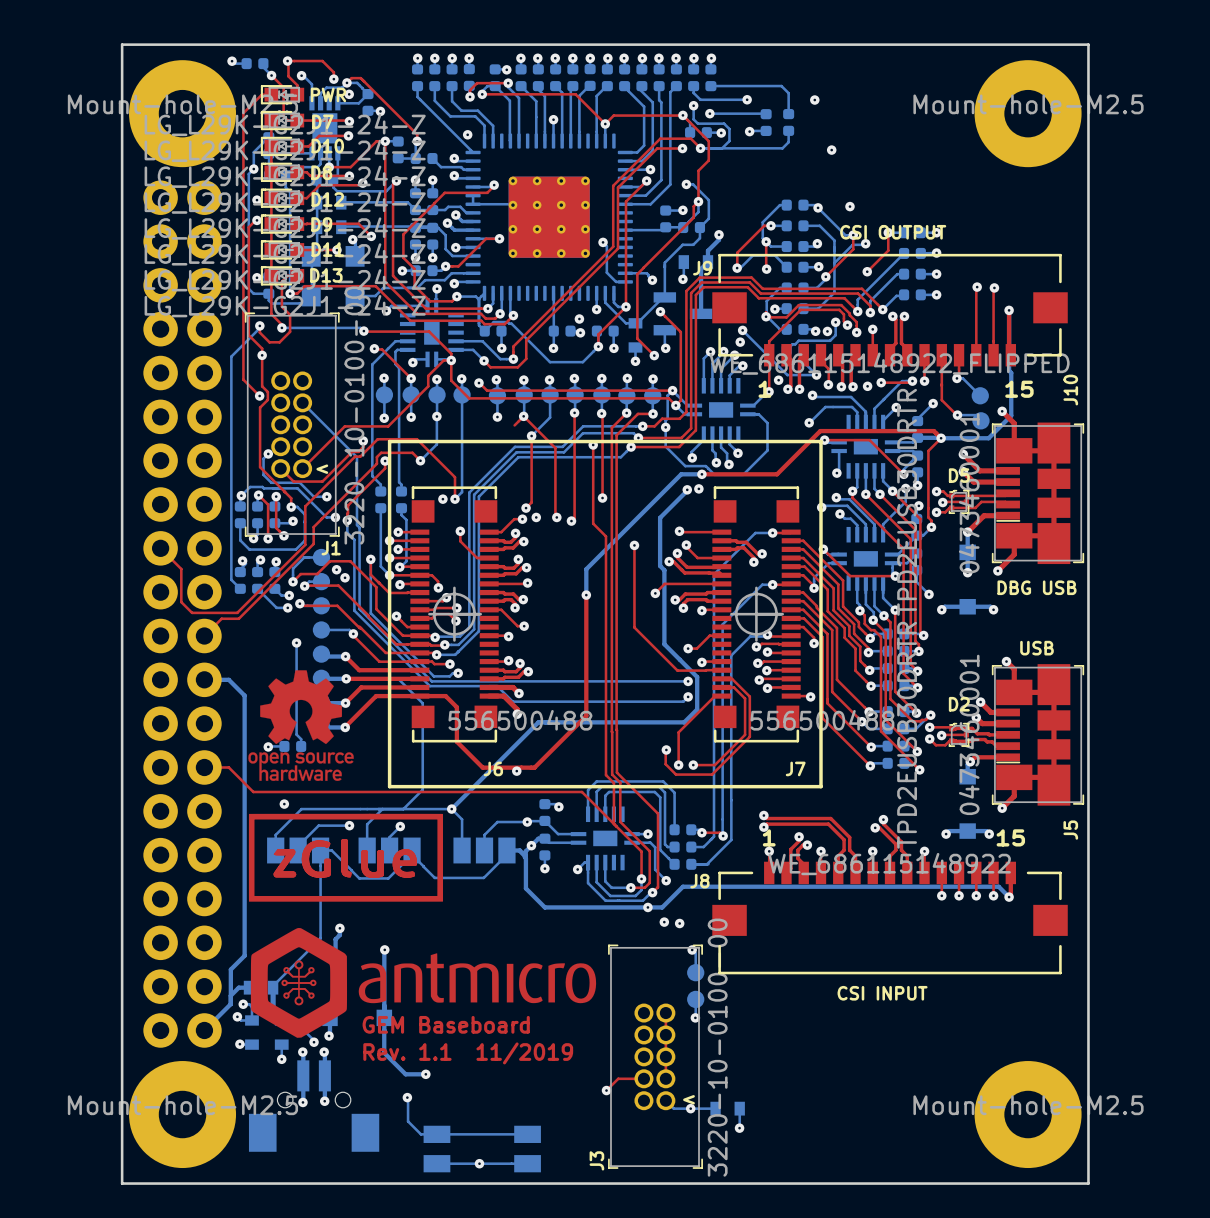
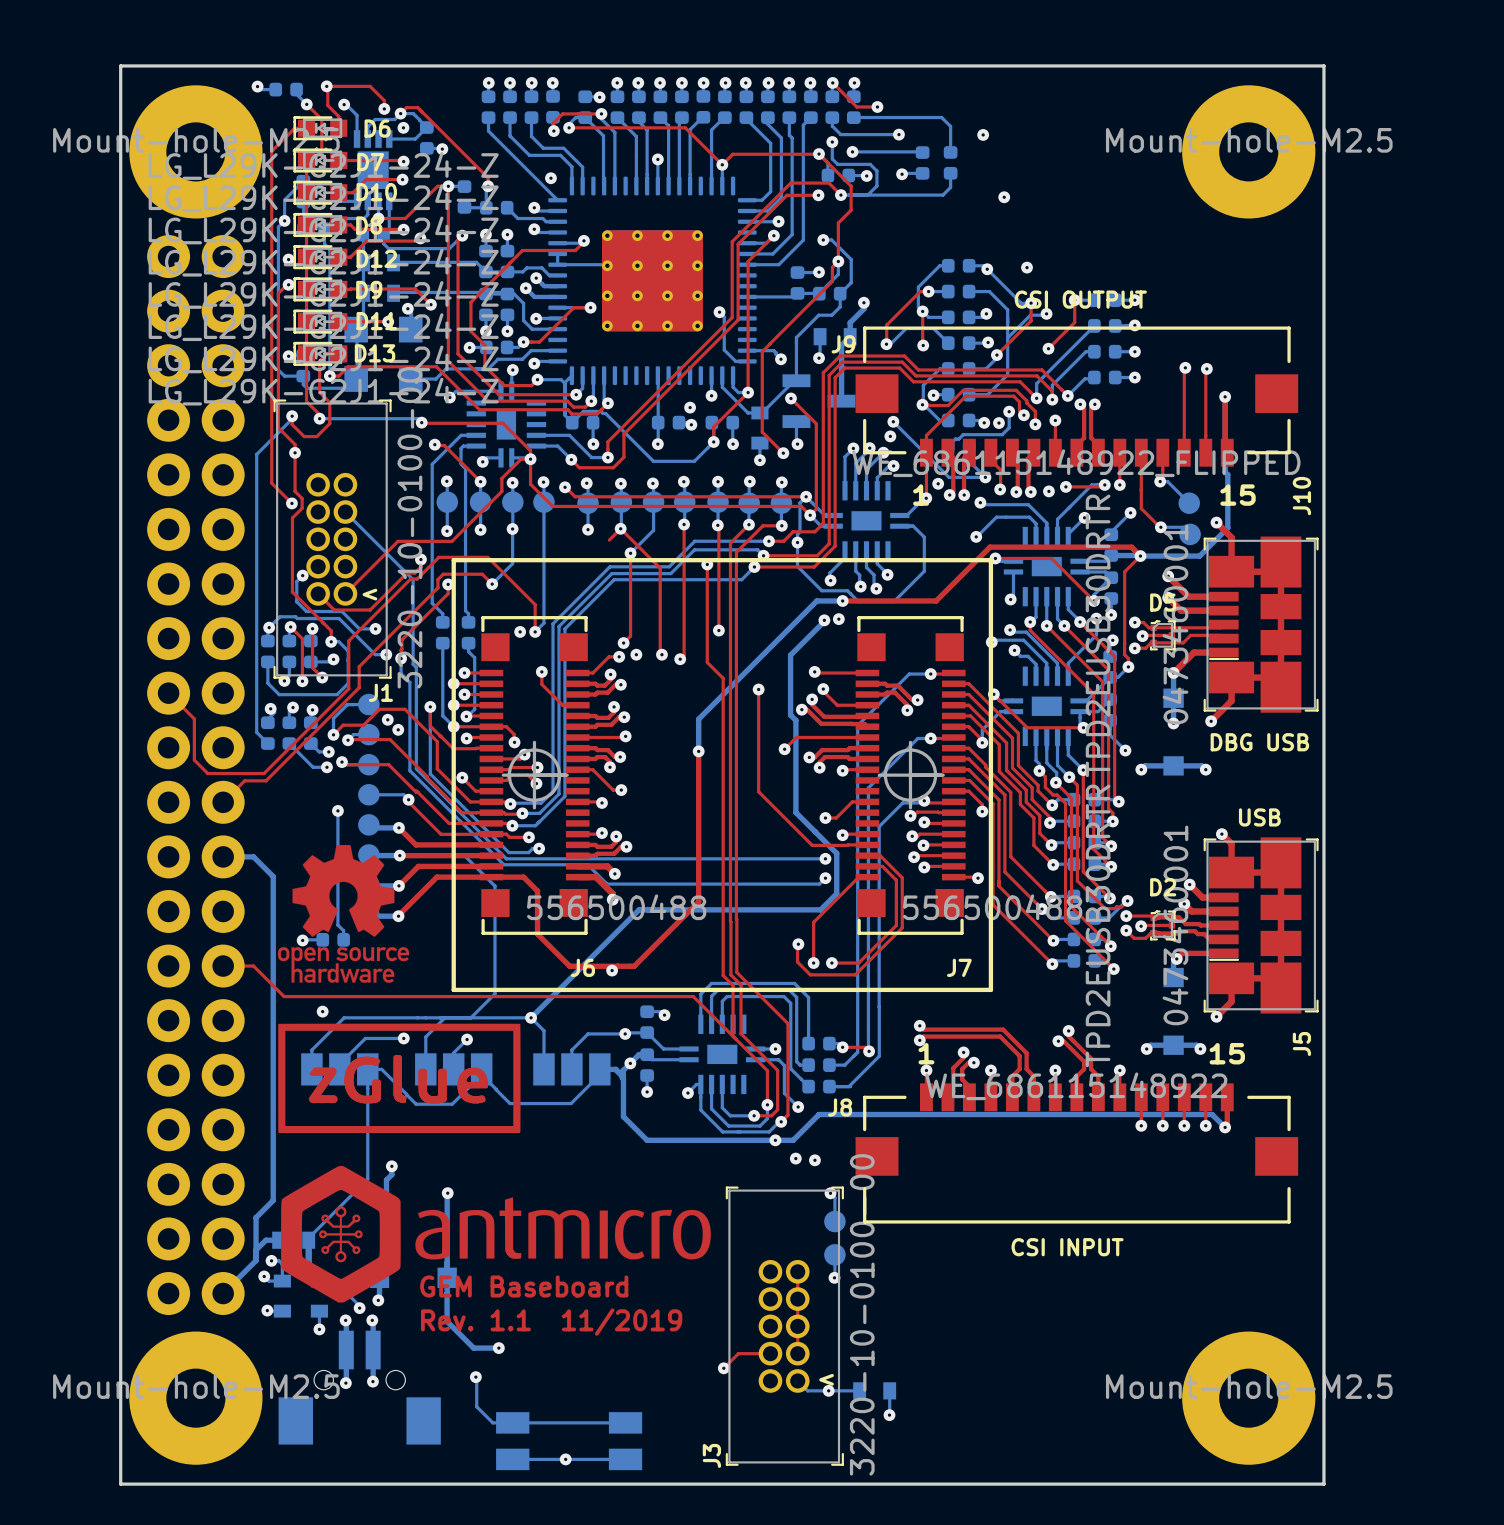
top track: none -> (832, 82) (856, 107) (877, 107)
via: none -> (877, 107)
PWR name: PWR (328, 94) -> D6 (377, 128)

